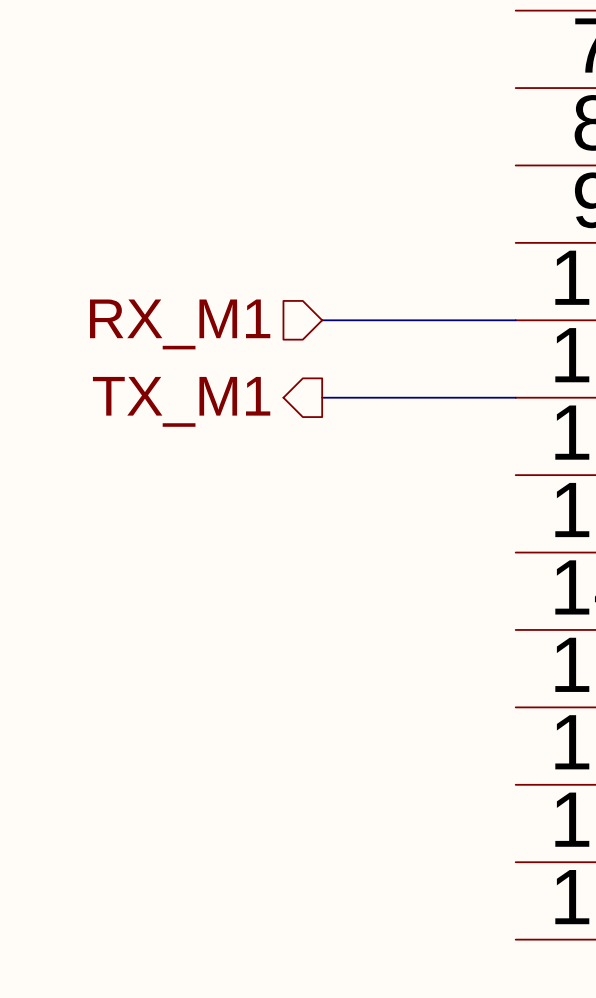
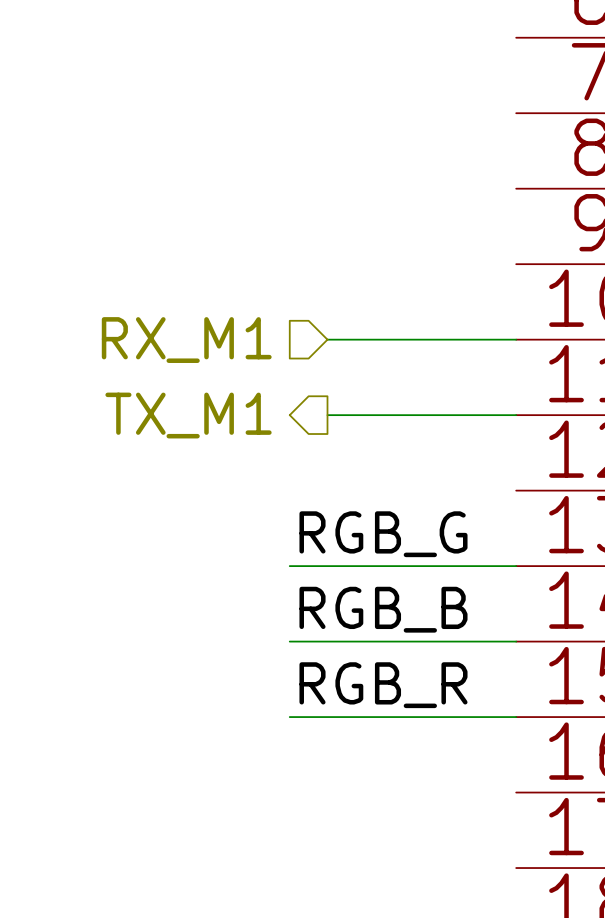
label: none -> RGB_G (383, 534)
wire: none -> (289, 566) (516, 566)
label: none -> RGB_B (383, 609)
wire: none -> (289, 641) (516, 641)
label: none -> RGB_R (383, 685)
wire: none -> (289, 717) (516, 717)

